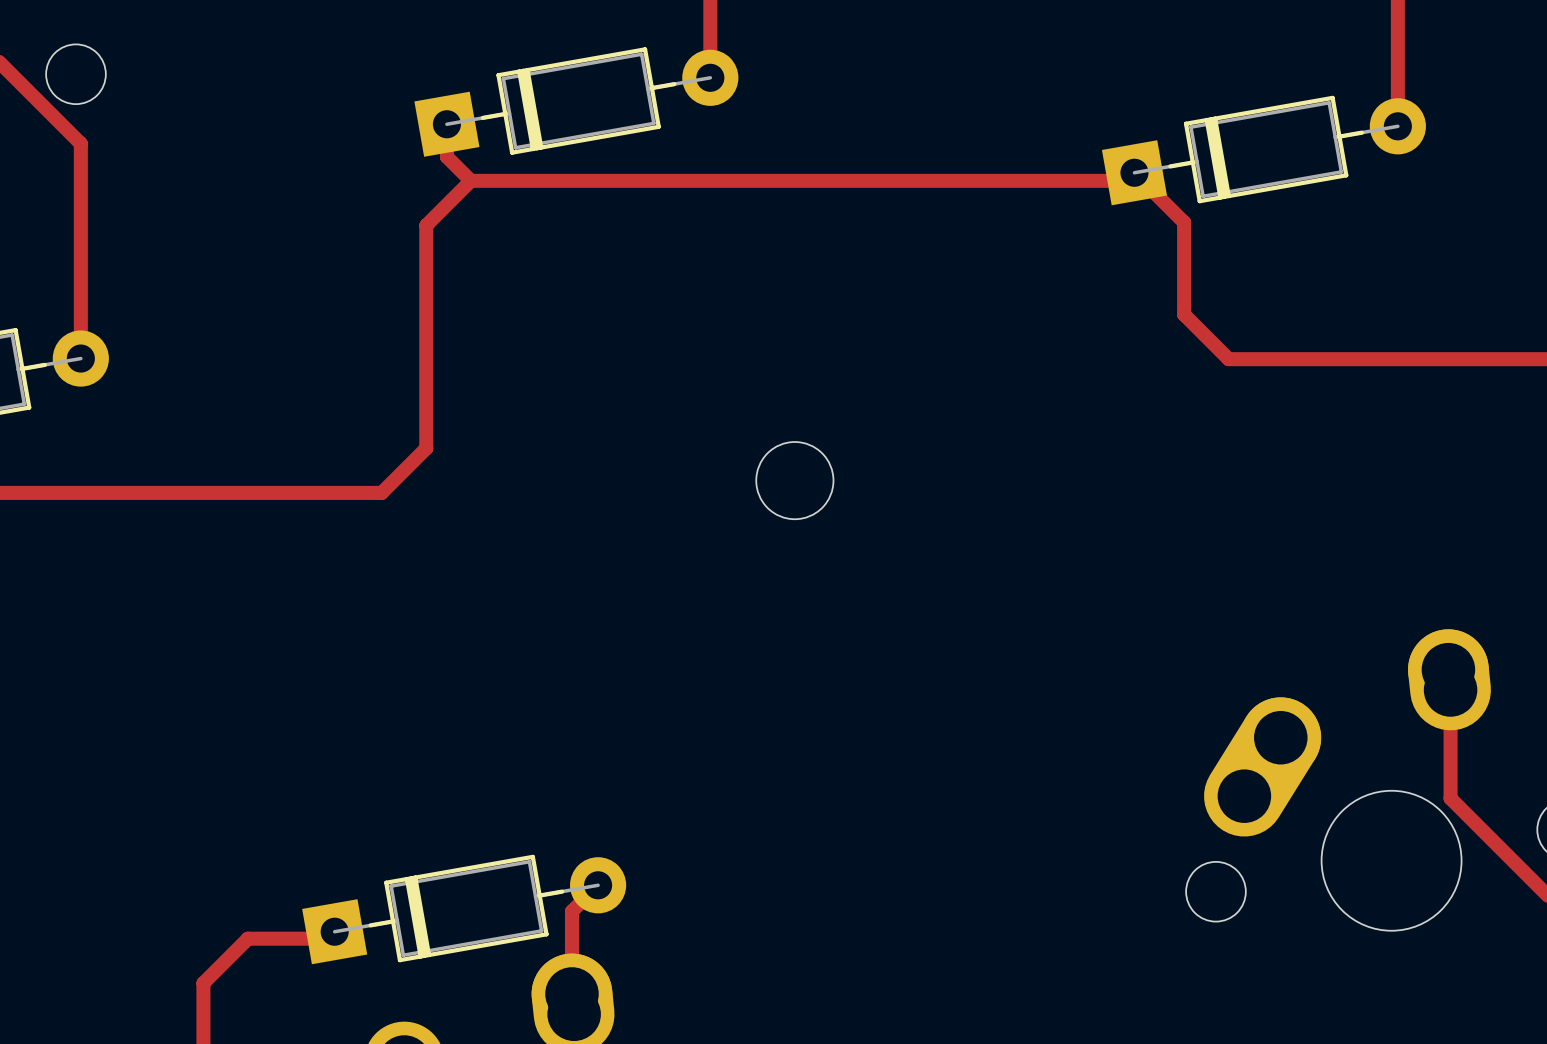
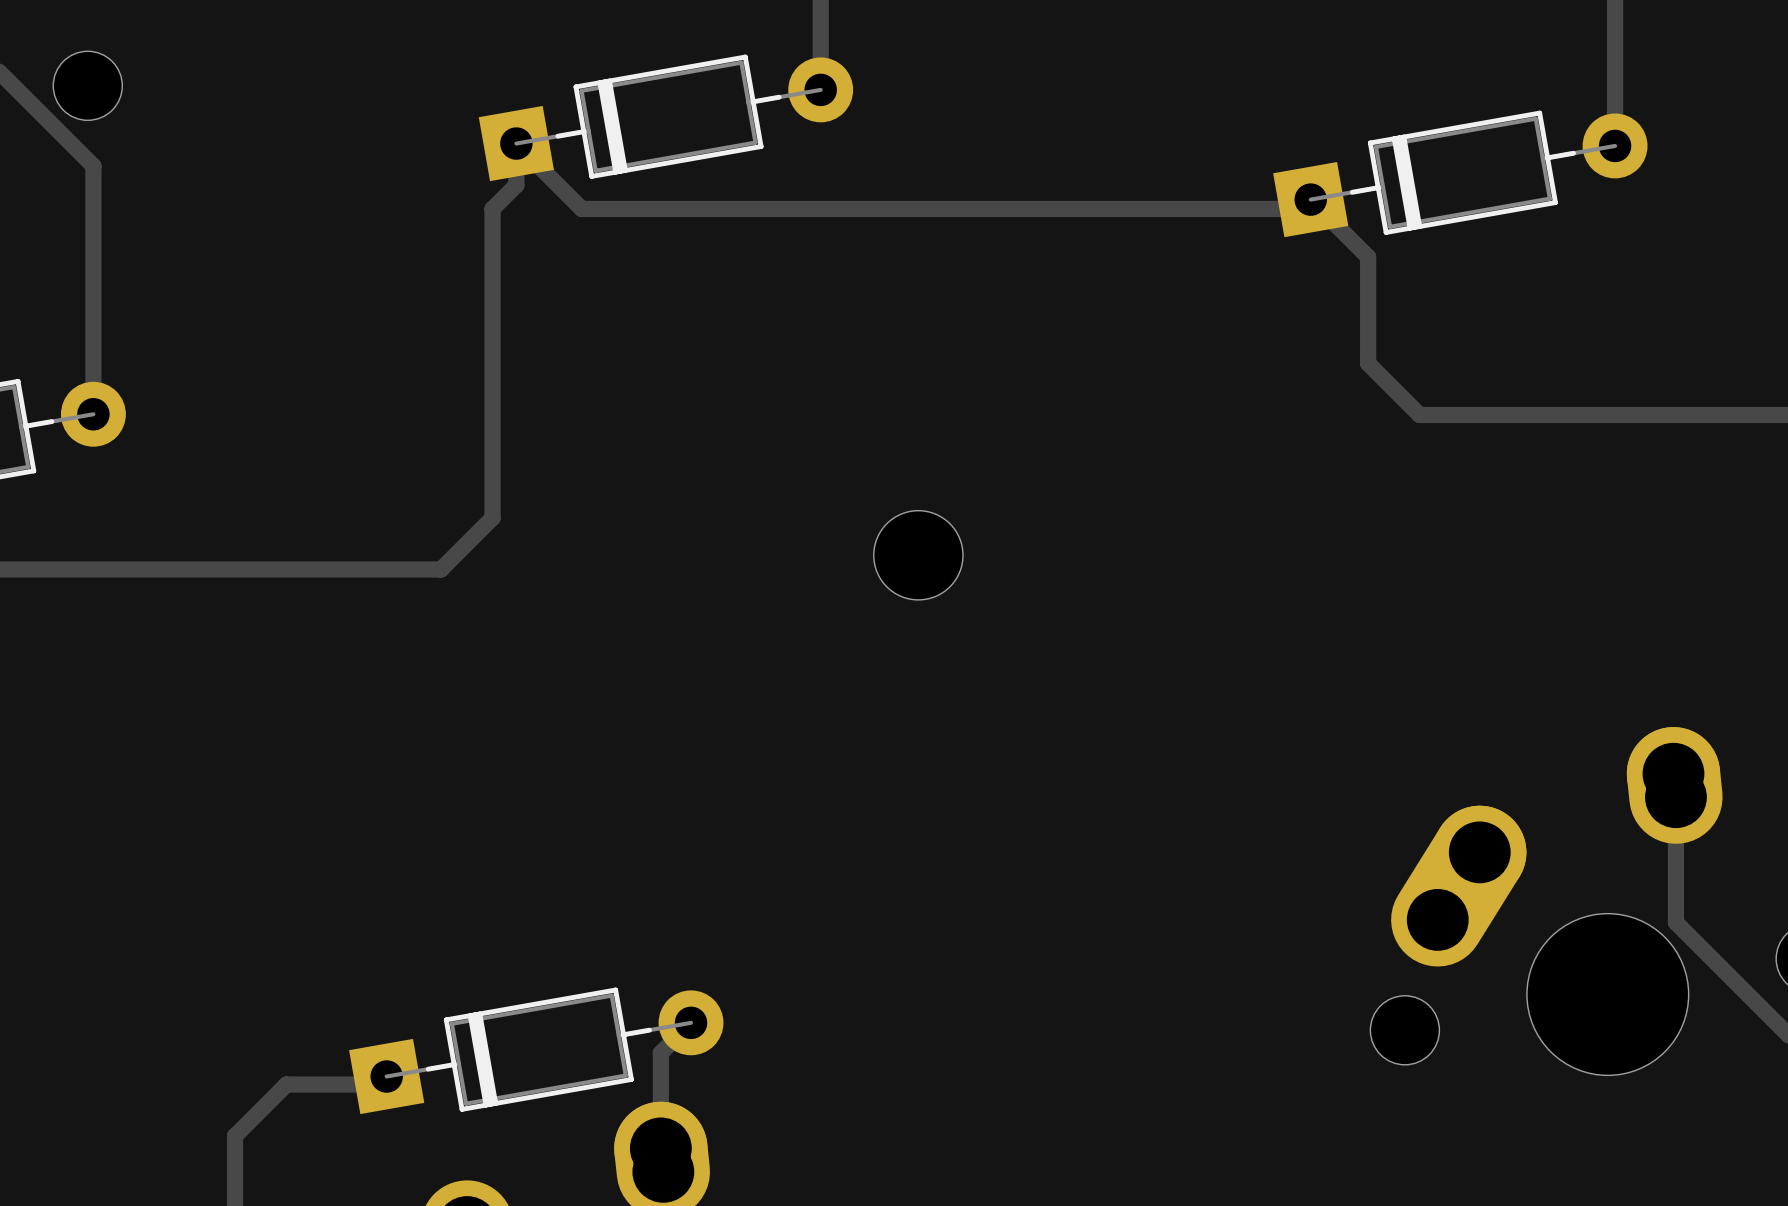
track: (446, 156) (470, 180) -> none
track: (470, 180) (426, 225) -> (516, 181) (516, 185) (492, 208) (492, 260)
track: (470, 180) (503, 180) -> (516, 143) (581, 208)

